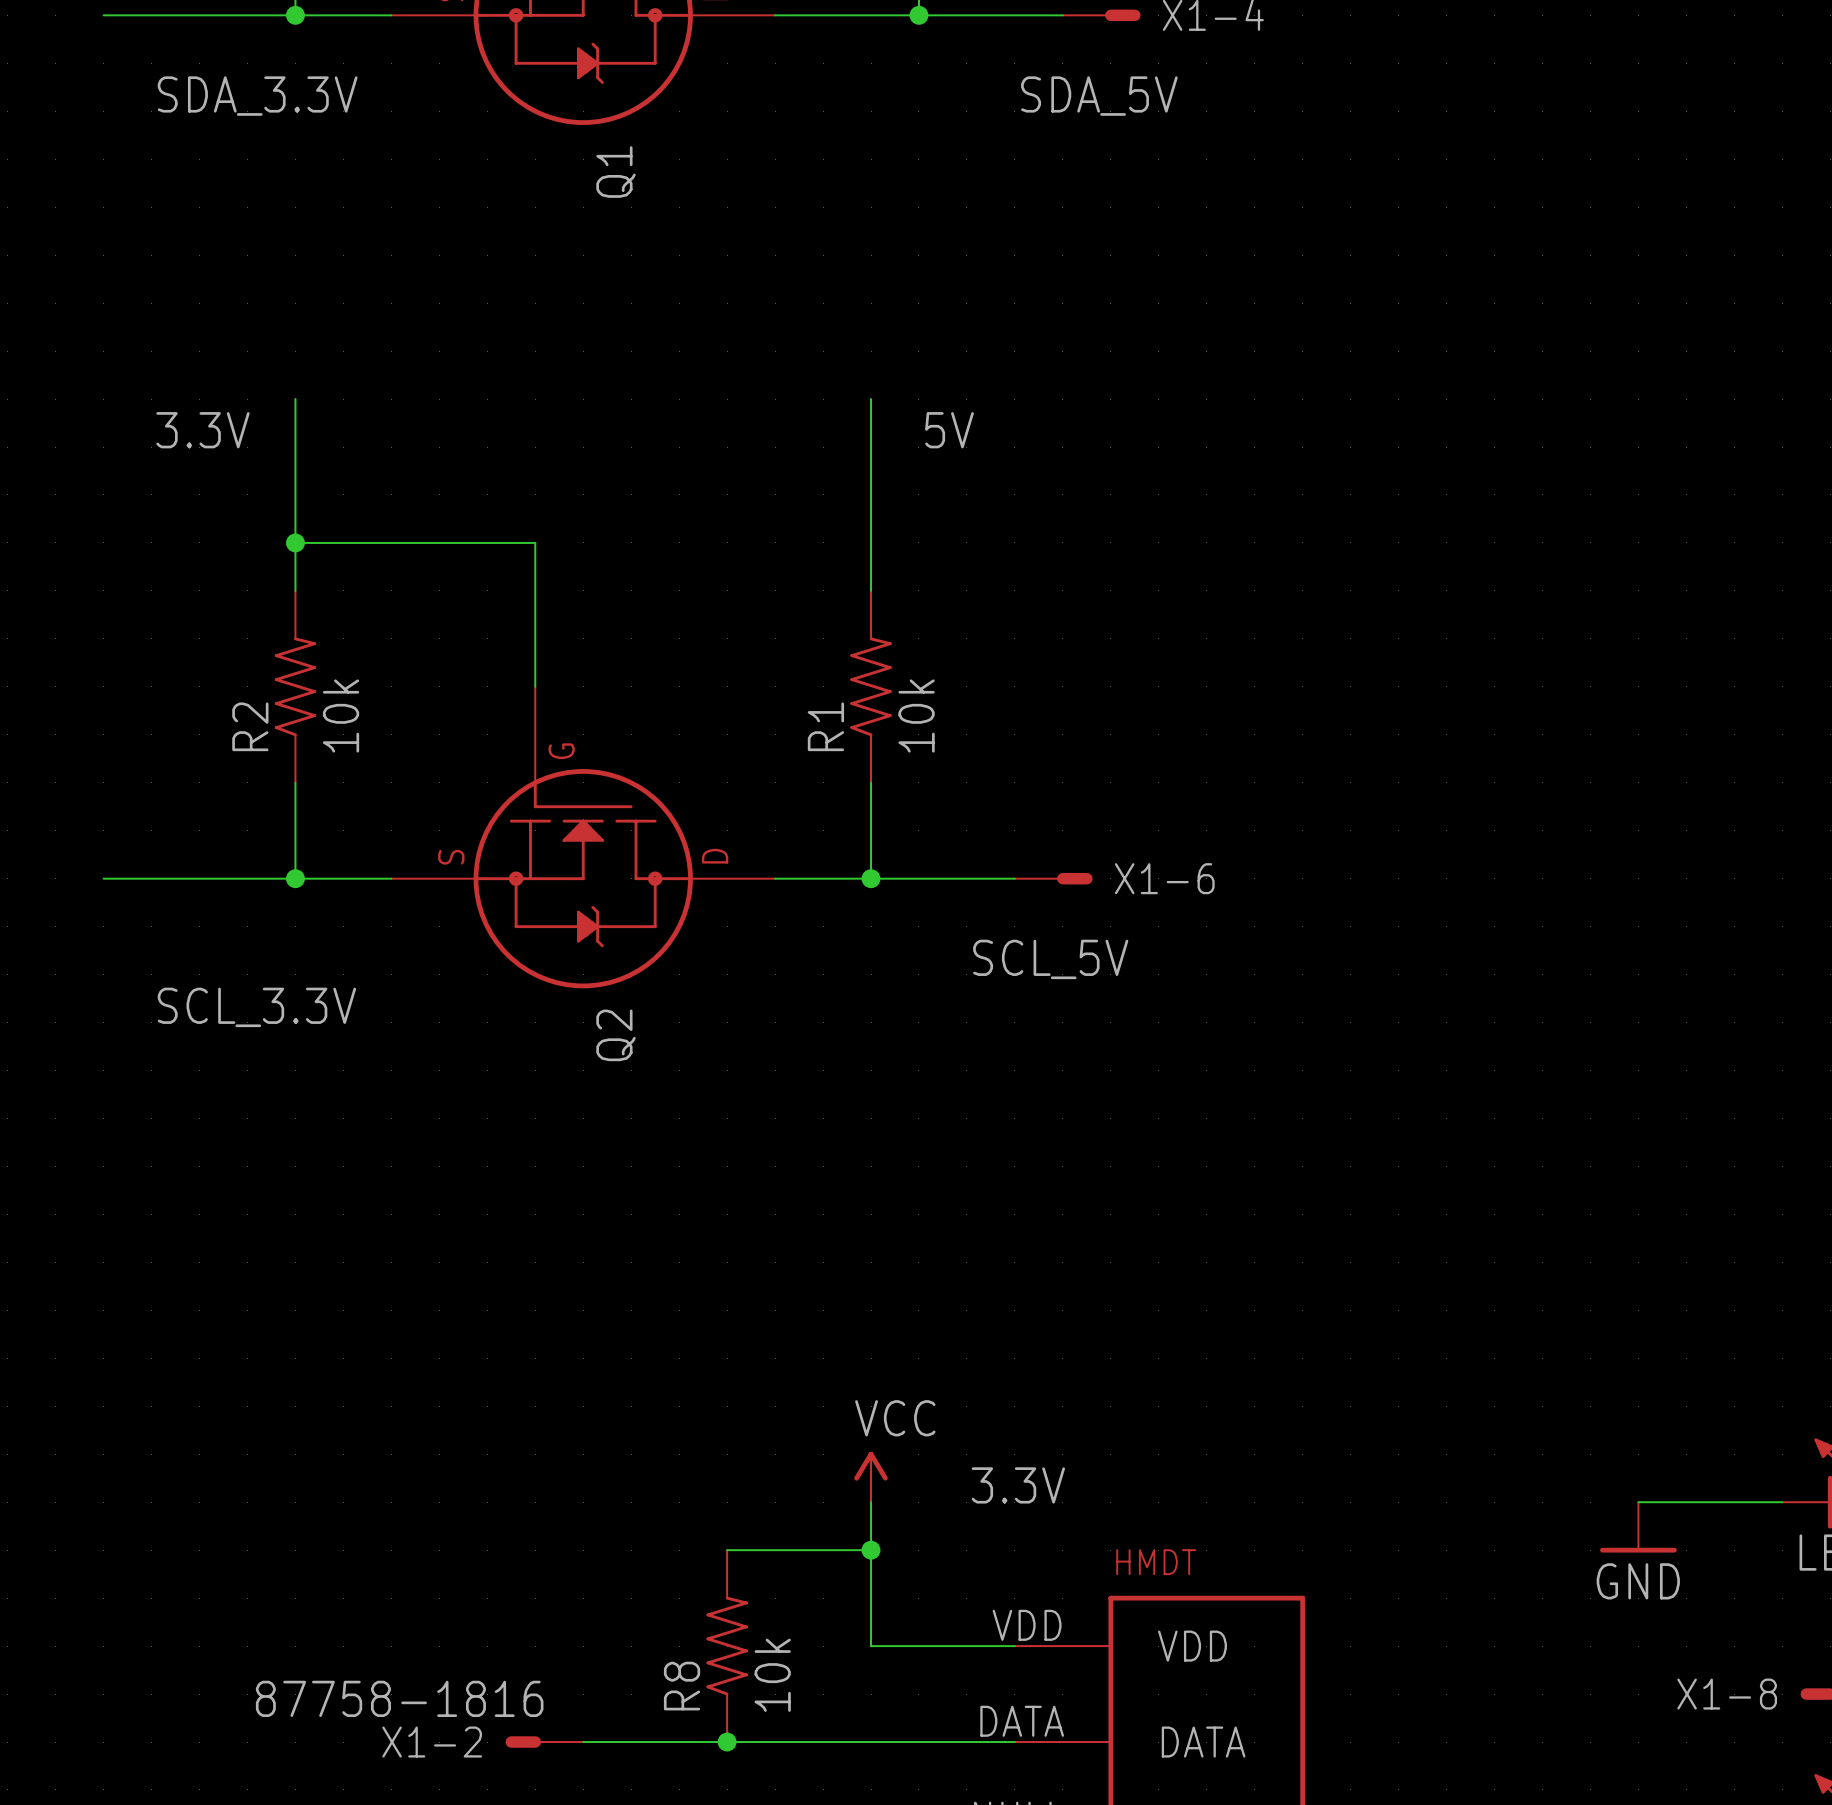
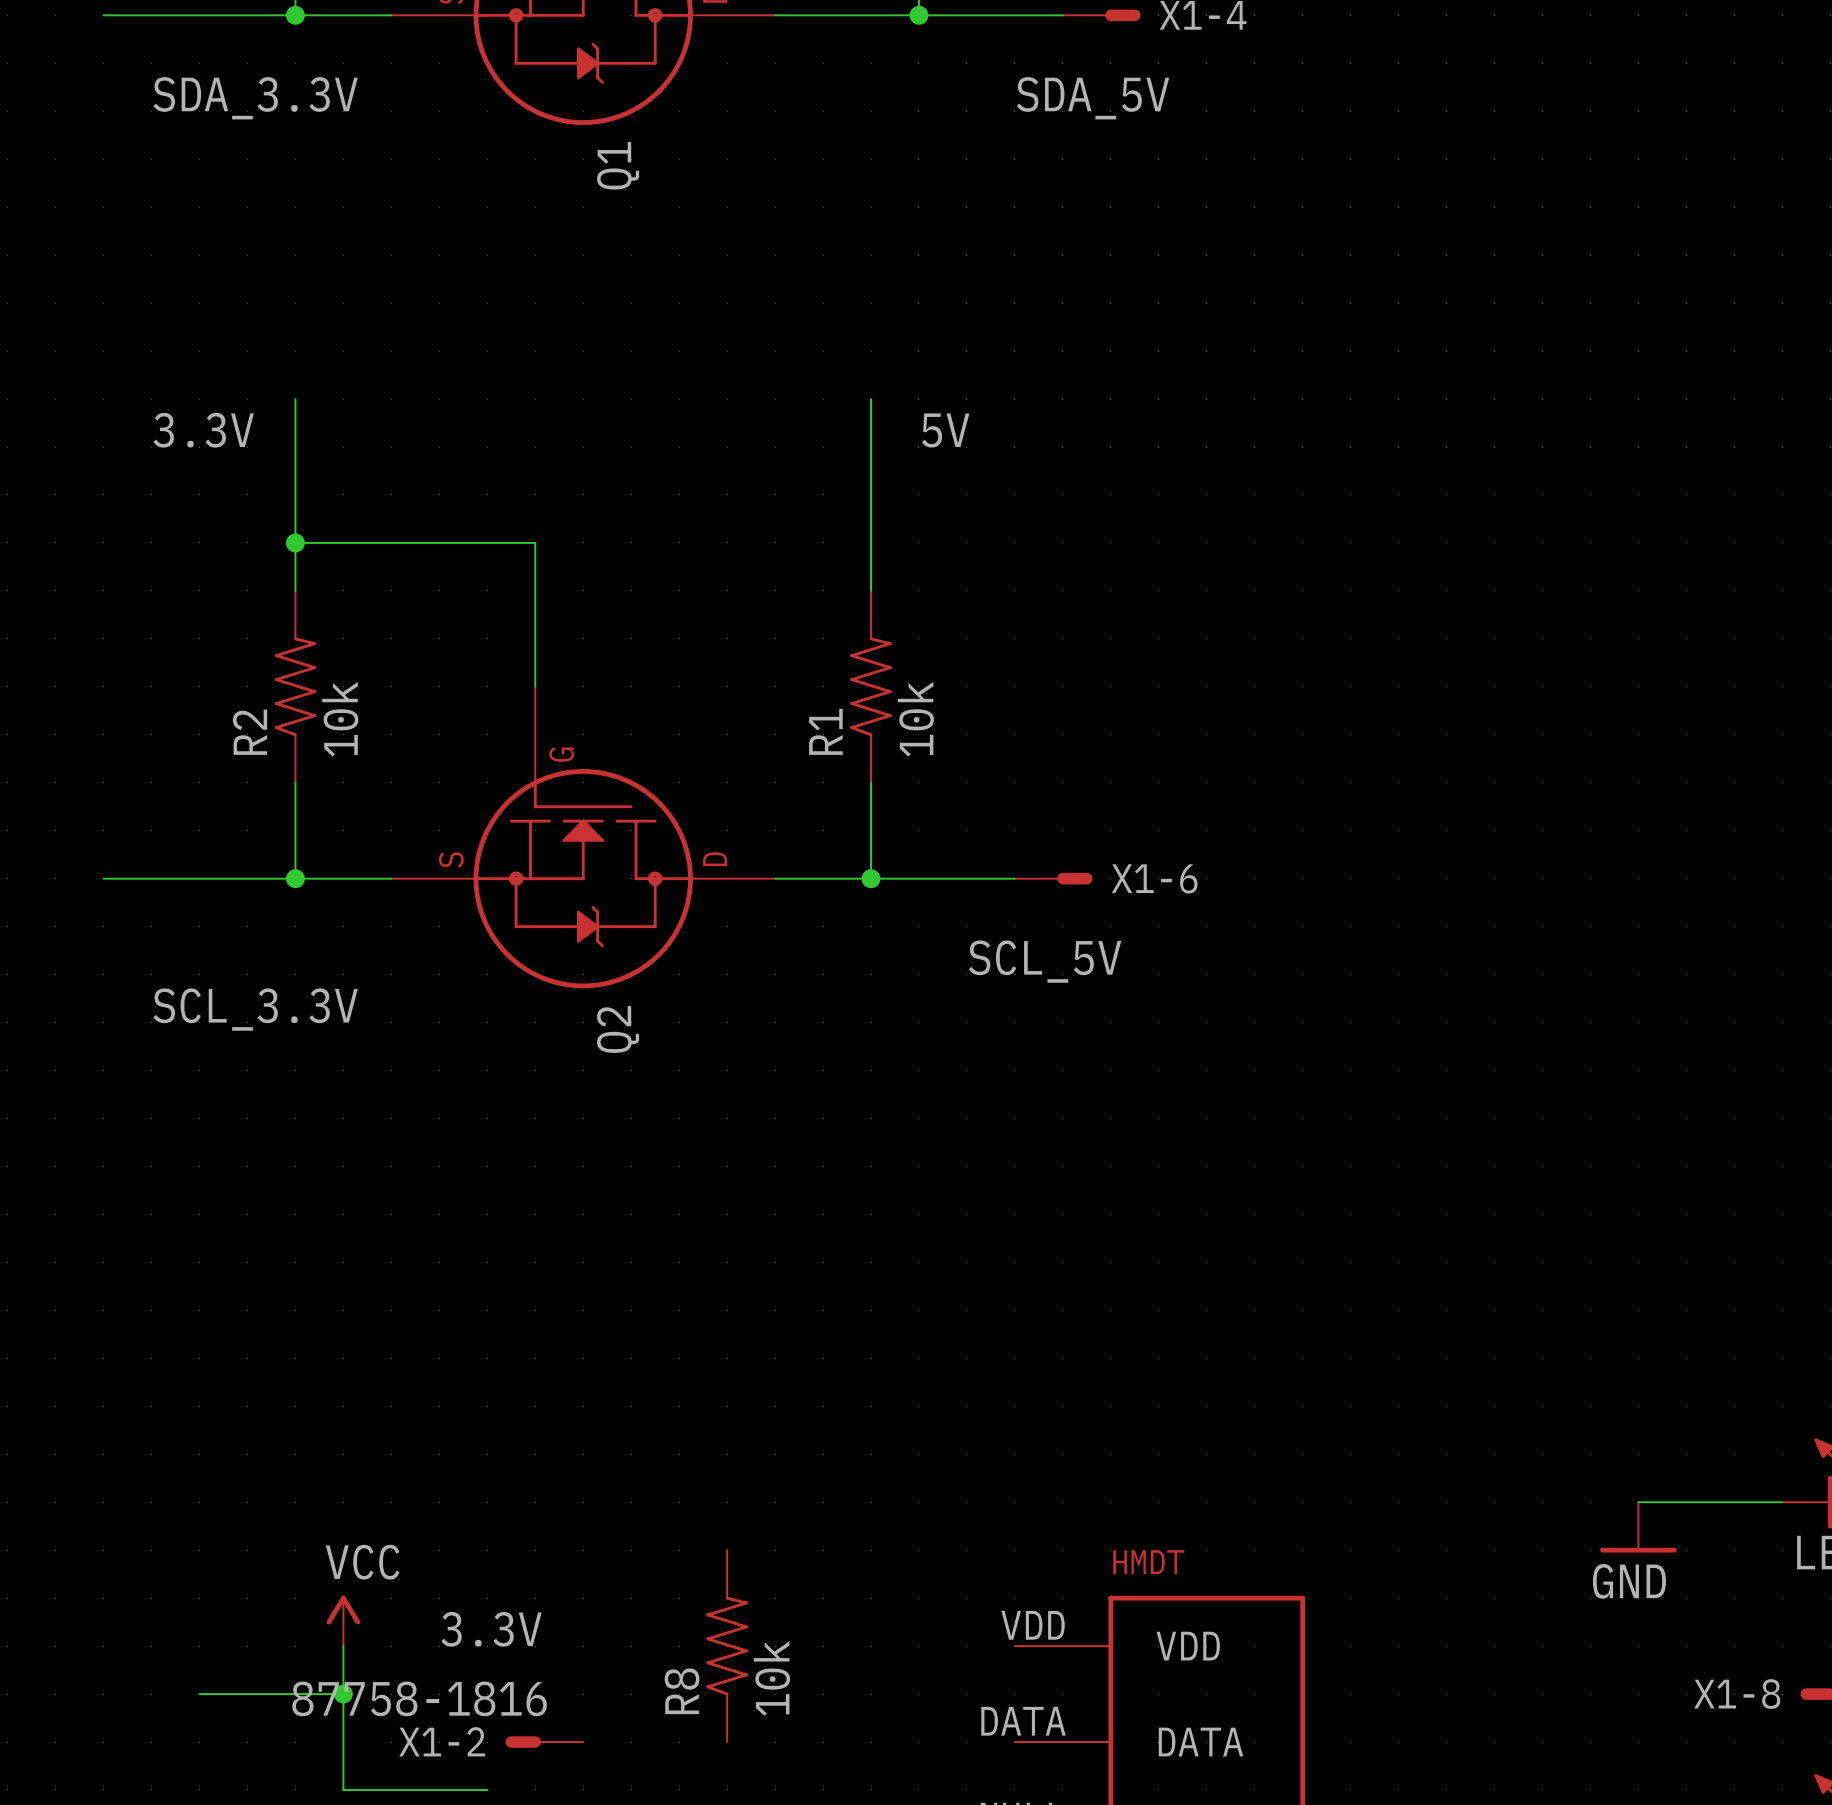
power symbol: VCC (871, 1477) -> none
label: 3.3V (1018, 1485) -> none
wire: (871, 1502) (871, 1646) (1014, 1646) -> none
wire: (727, 1550) (871, 1550) -> none
junction: (871, 1550) -> none
power symbol: none -> VCC (343, 1620)
label: none -> 3.3V (491, 1629)
wire: none -> (343, 1646) (343, 1789) (487, 1789)
wire: none -> (199, 1694) (343, 1694)
junction: none -> (343, 1694)
wire: (583, 1742) (1014, 1742) -> none
junction: (727, 1742) -> none

